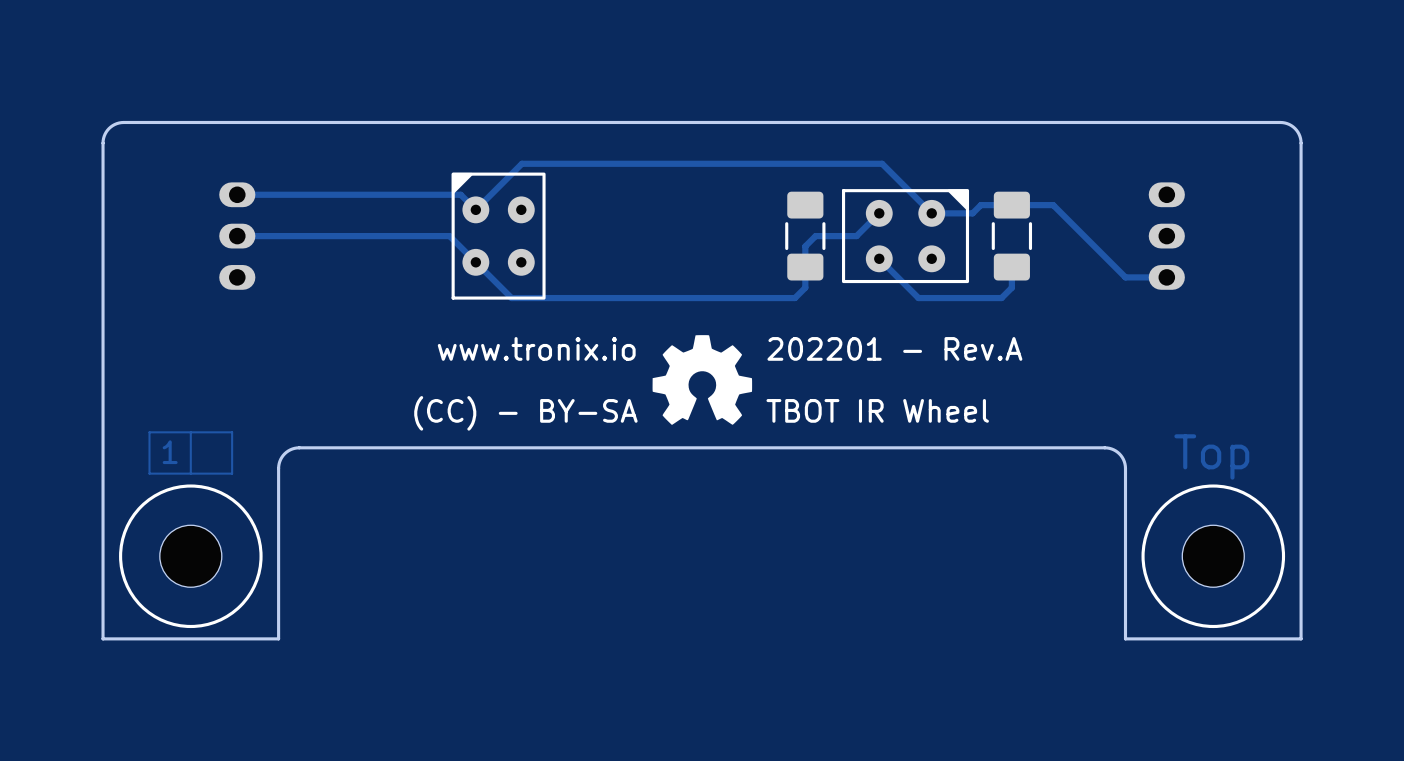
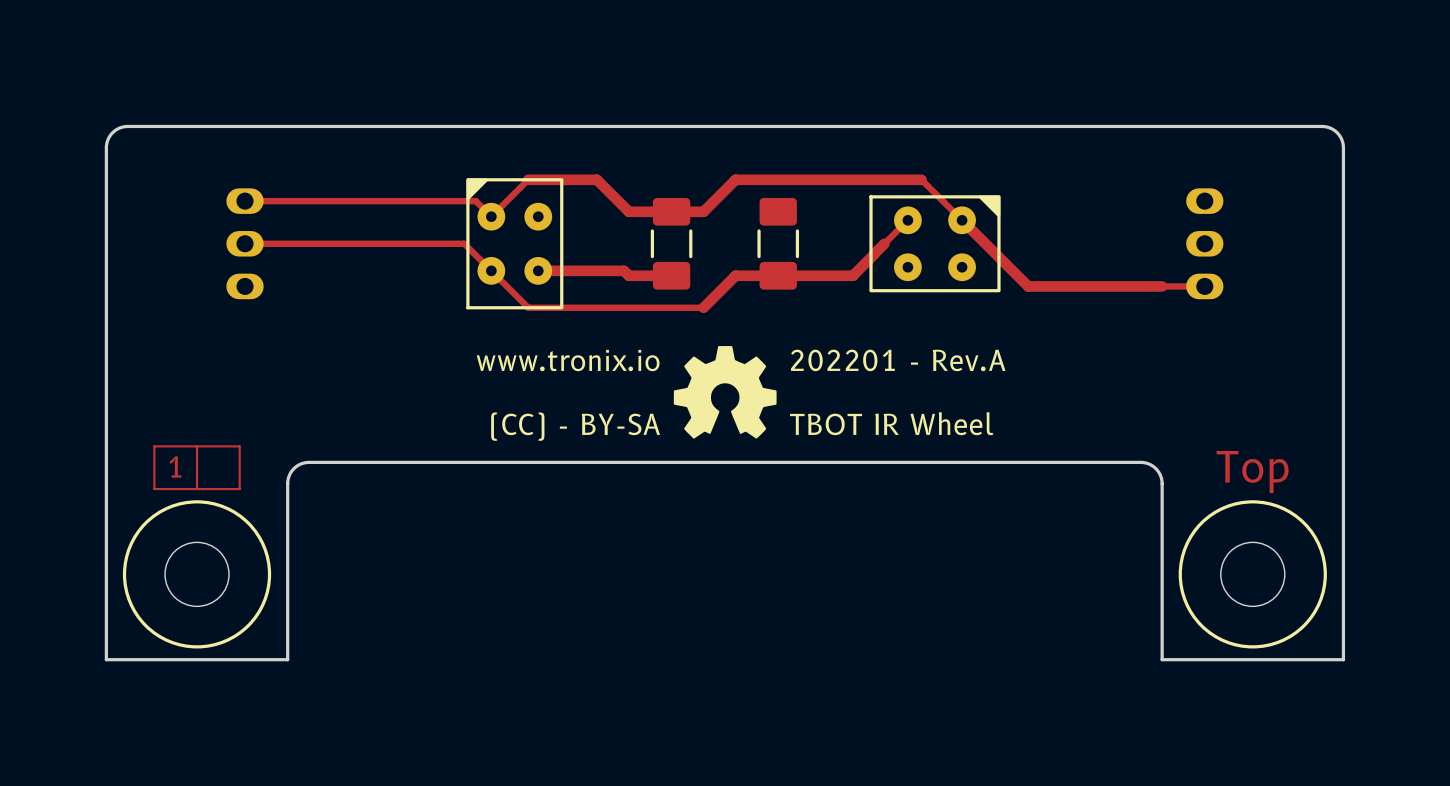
track: (511, 174) (521, 163) (882, 163) (892, 174) -> (528, 179) (596, 179) (628, 211) (703, 211) (735, 179) (921, 179)
track: (931, 213) (972, 213) (980, 205) (1053, 205) (1125, 277) -> (962, 220) (1028, 286) (1162, 286)
part: none -> (671, 243)
part position: (805, 236) -> (778, 243)
track: (856, 236) (815, 236) (805, 246) (805, 287) (795, 298) (681, 298) -> (874, 254) (852, 275) (735, 275) (703, 307)
track: none -> (884, 243) (874, 254)
part: (1011, 236) -> none
track: (879, 258) (918, 298) (1001, 298) (1011, 287) (1011, 267) -> none
track: none -> (538, 270) (624, 270) (628, 275) (671, 275)

